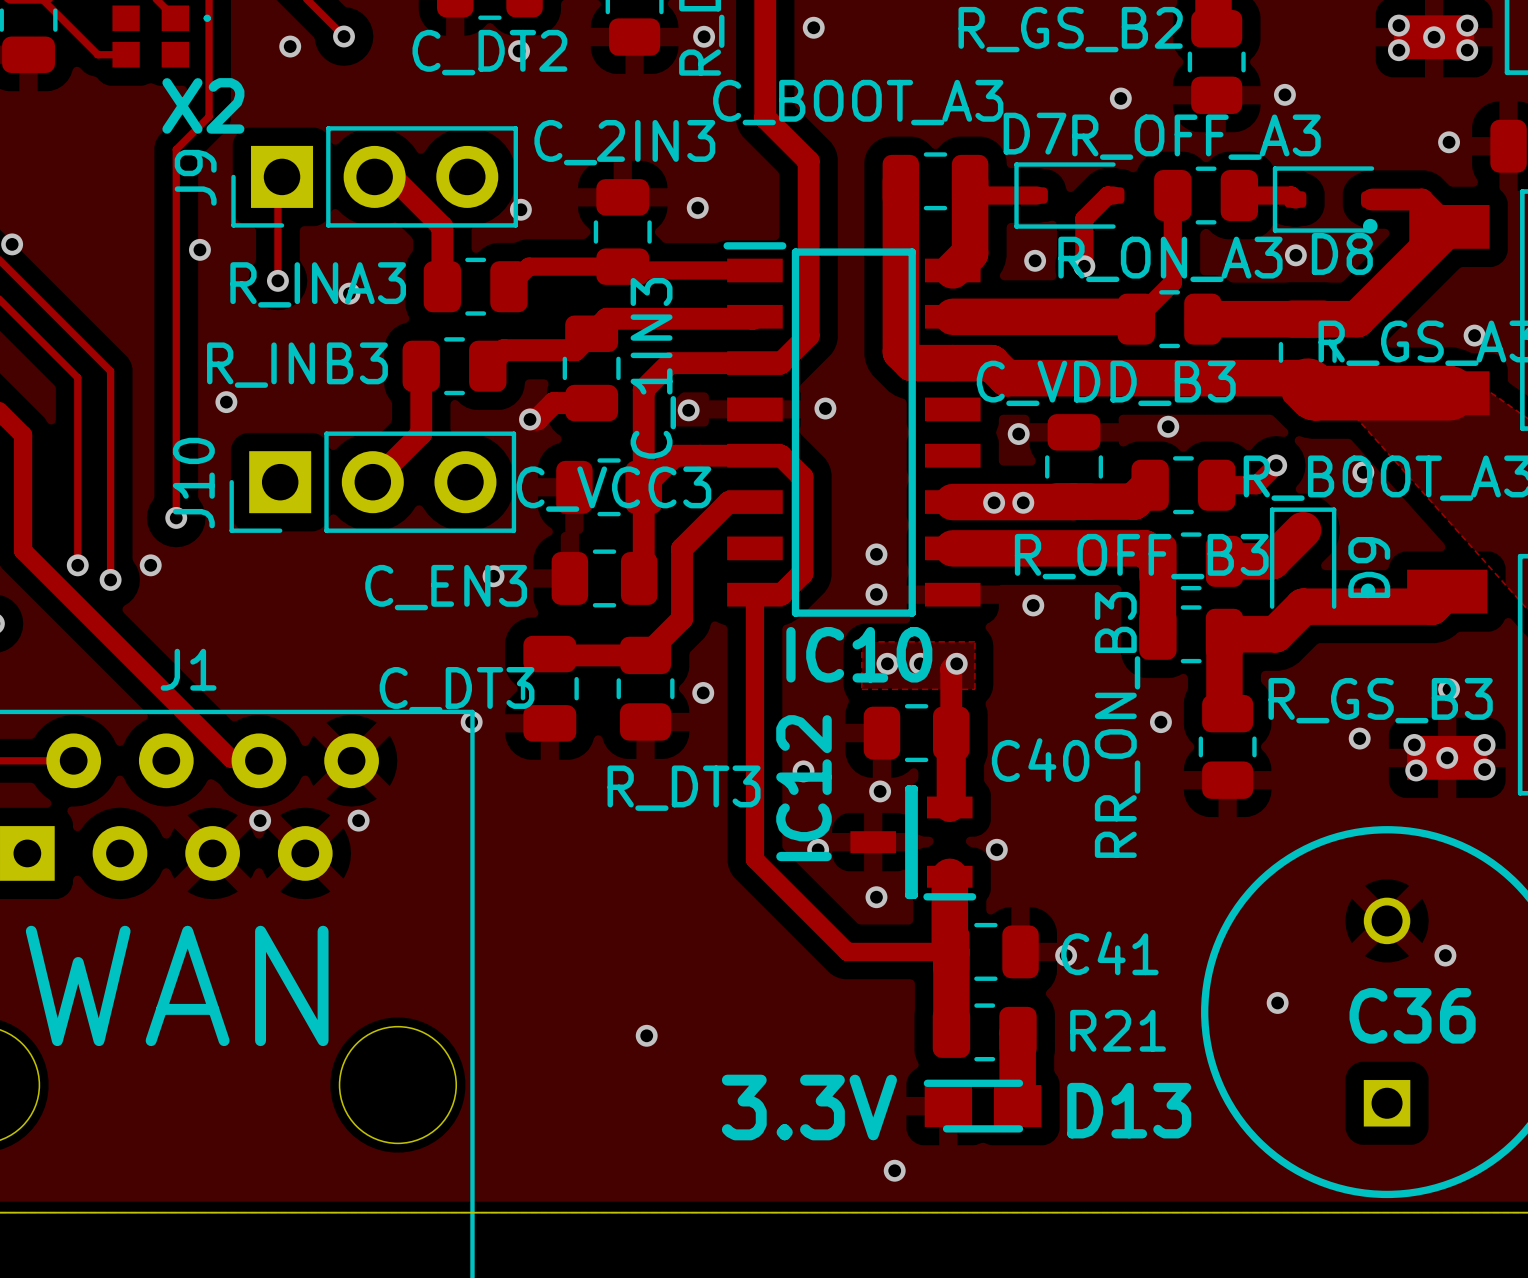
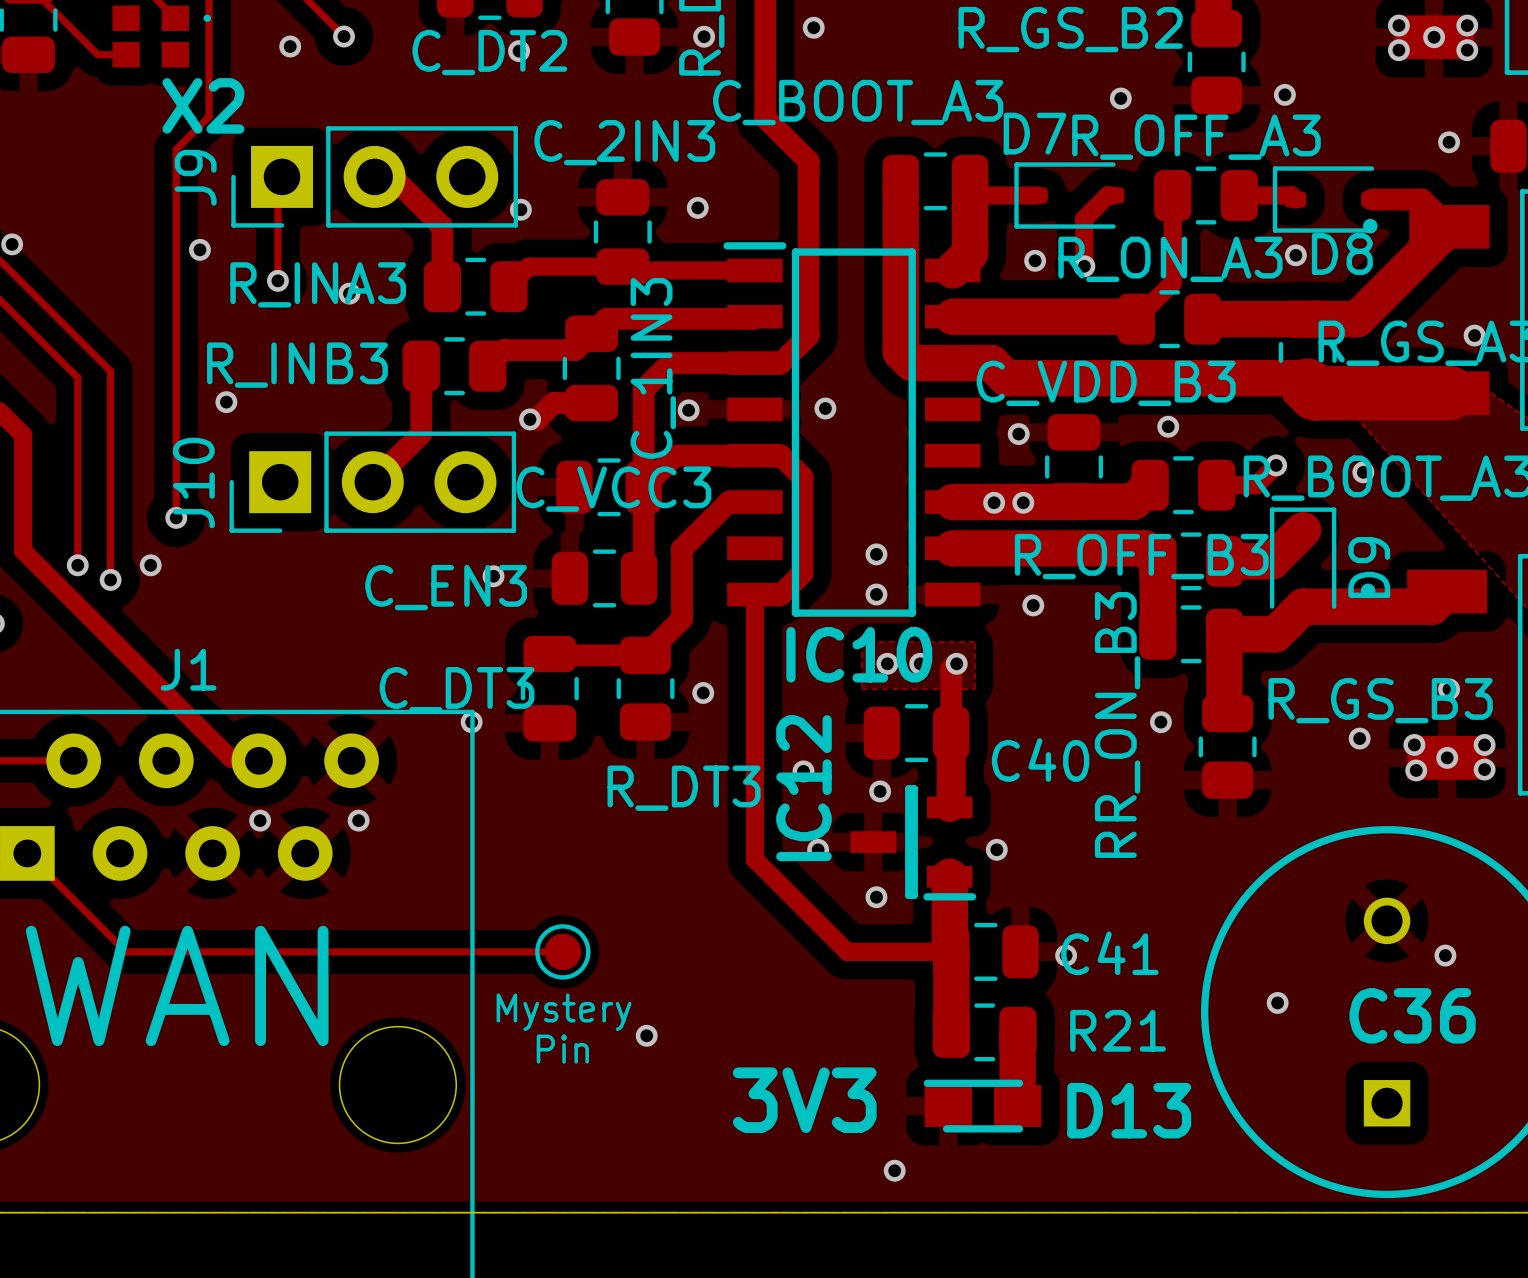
track: none -> (27, 853) (125, 951) (562, 951)
part: none -> (562, 951)
text: none -> Mystery (564, 1012)
text: none -> Pin (562, 1049)
text: 3.3V (809, 1107) -> 3V3 (804, 1100)

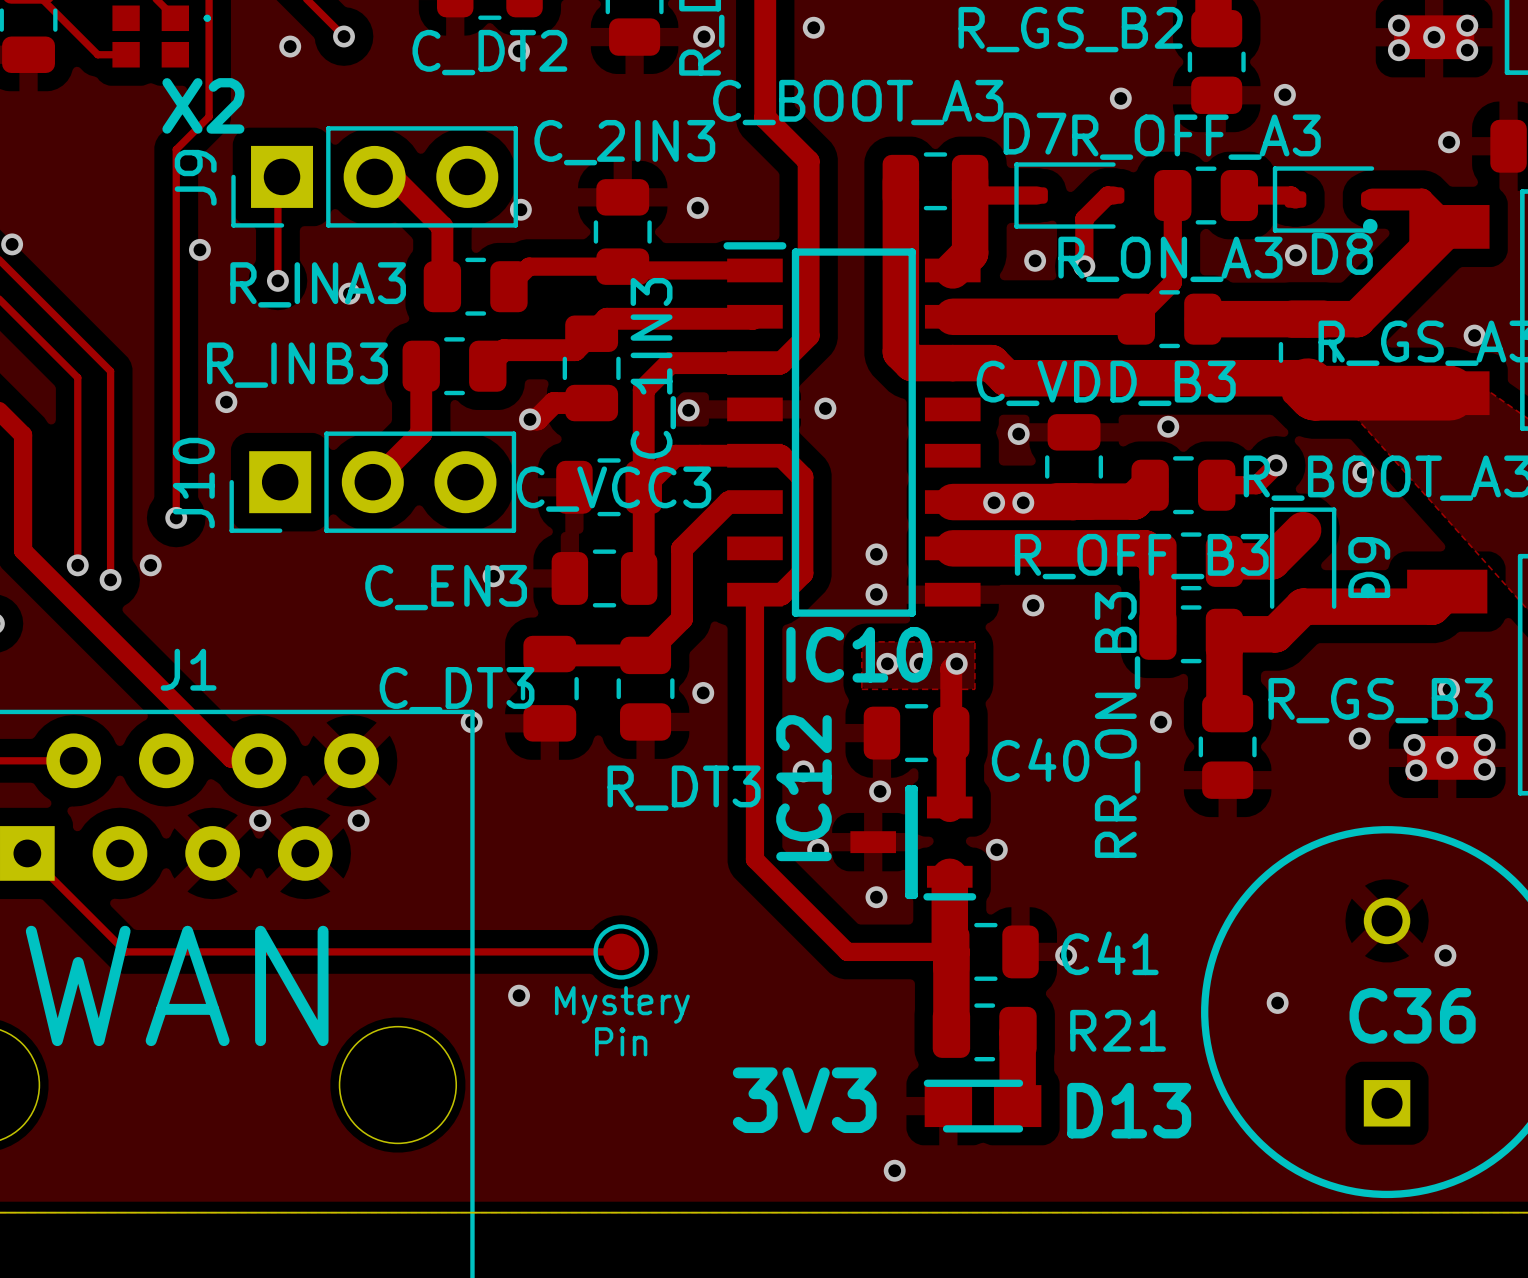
track: none -> (562, 951) (621, 951)
part position: (562, 951) -> (621, 951)
text position: Mystery (564, 1012) -> Mystery (622, 1004)
via position: (646, 1035) -> (519, 995)
text position: Pin (562, 1049) -> Pin (621, 1041)

